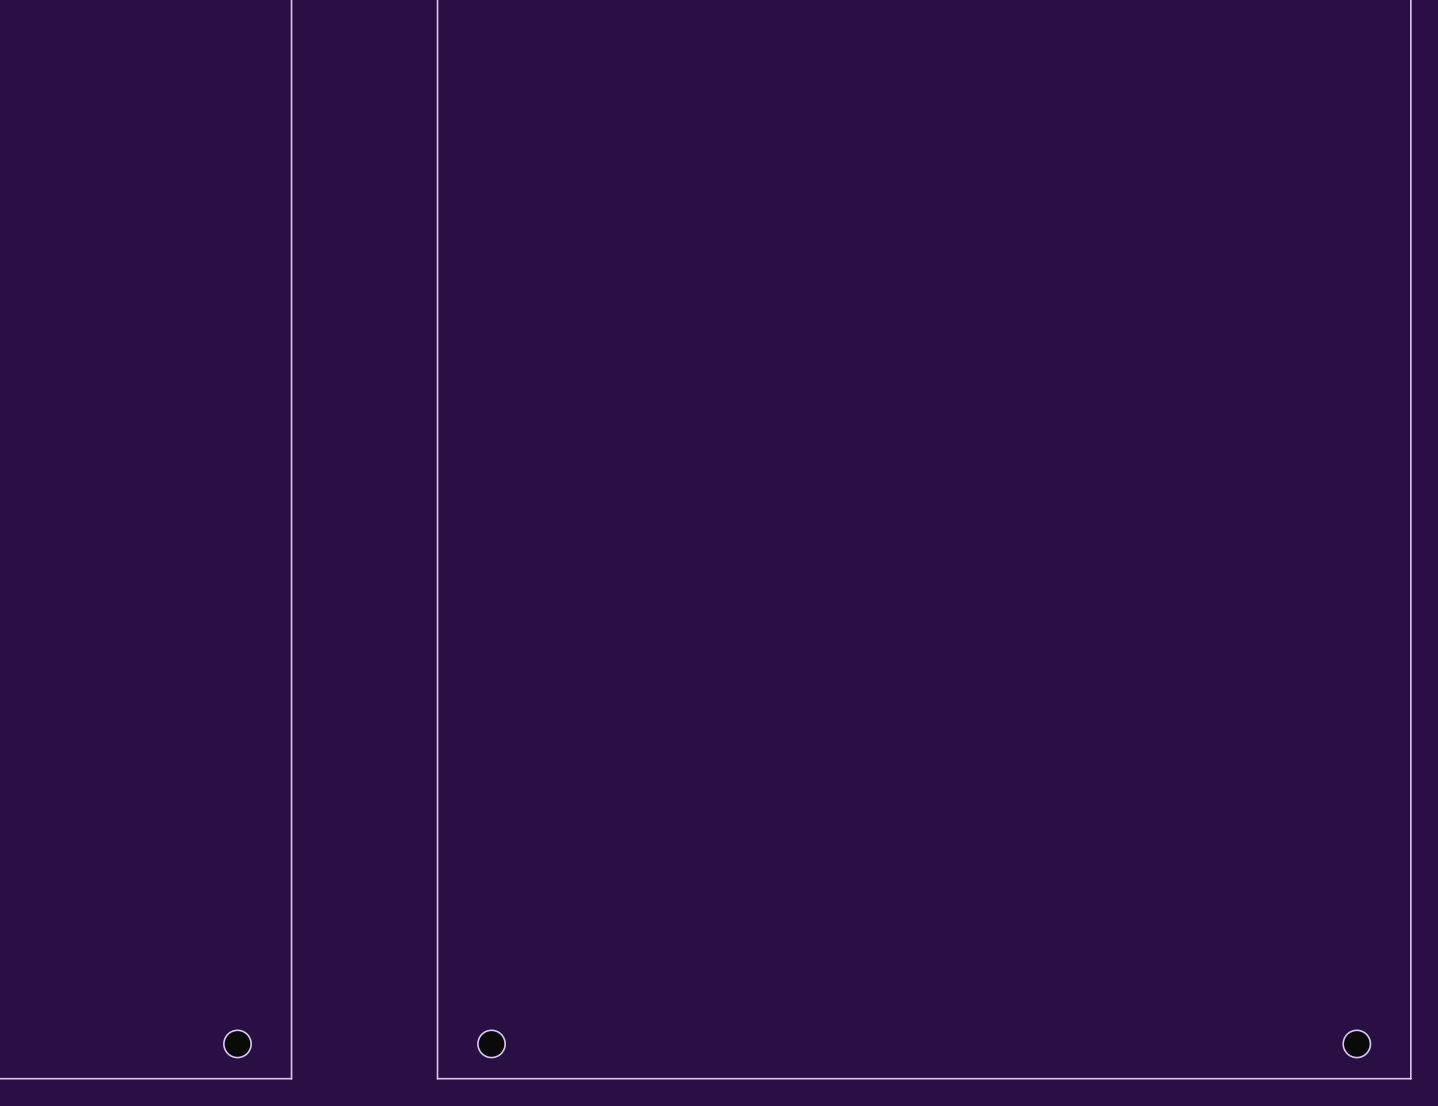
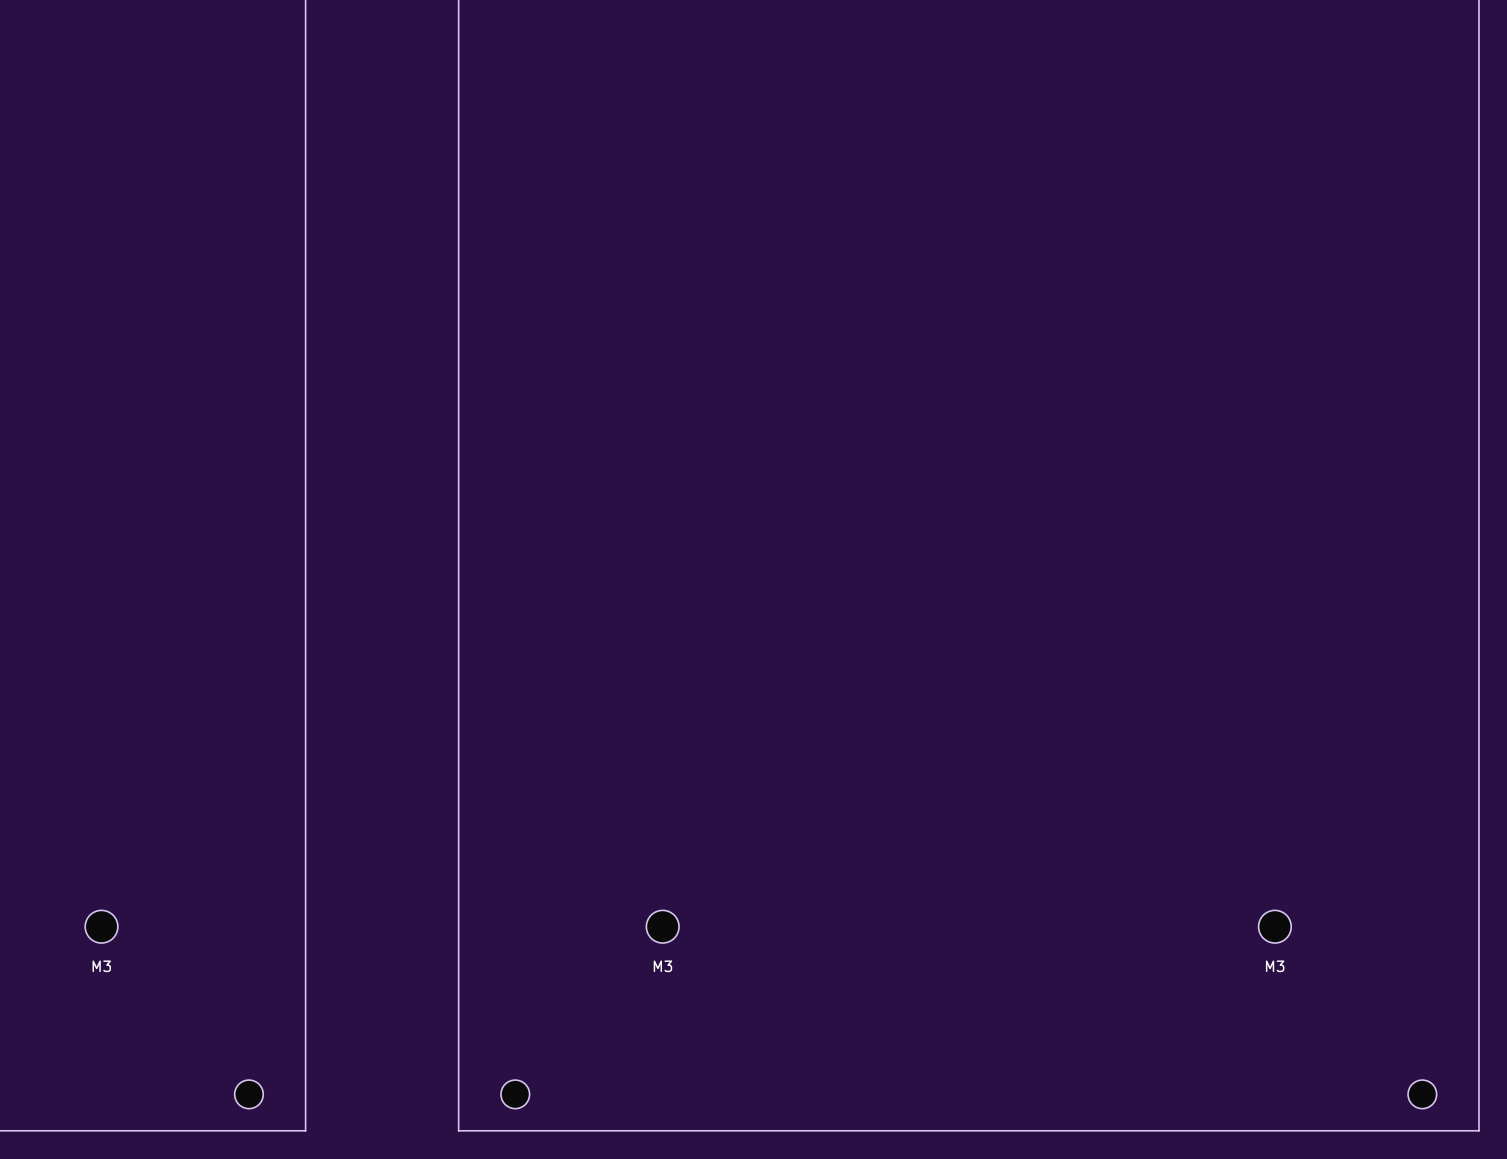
part: none -> (101, 926)
part: none -> (662, 926)
part: none -> (1274, 926)

